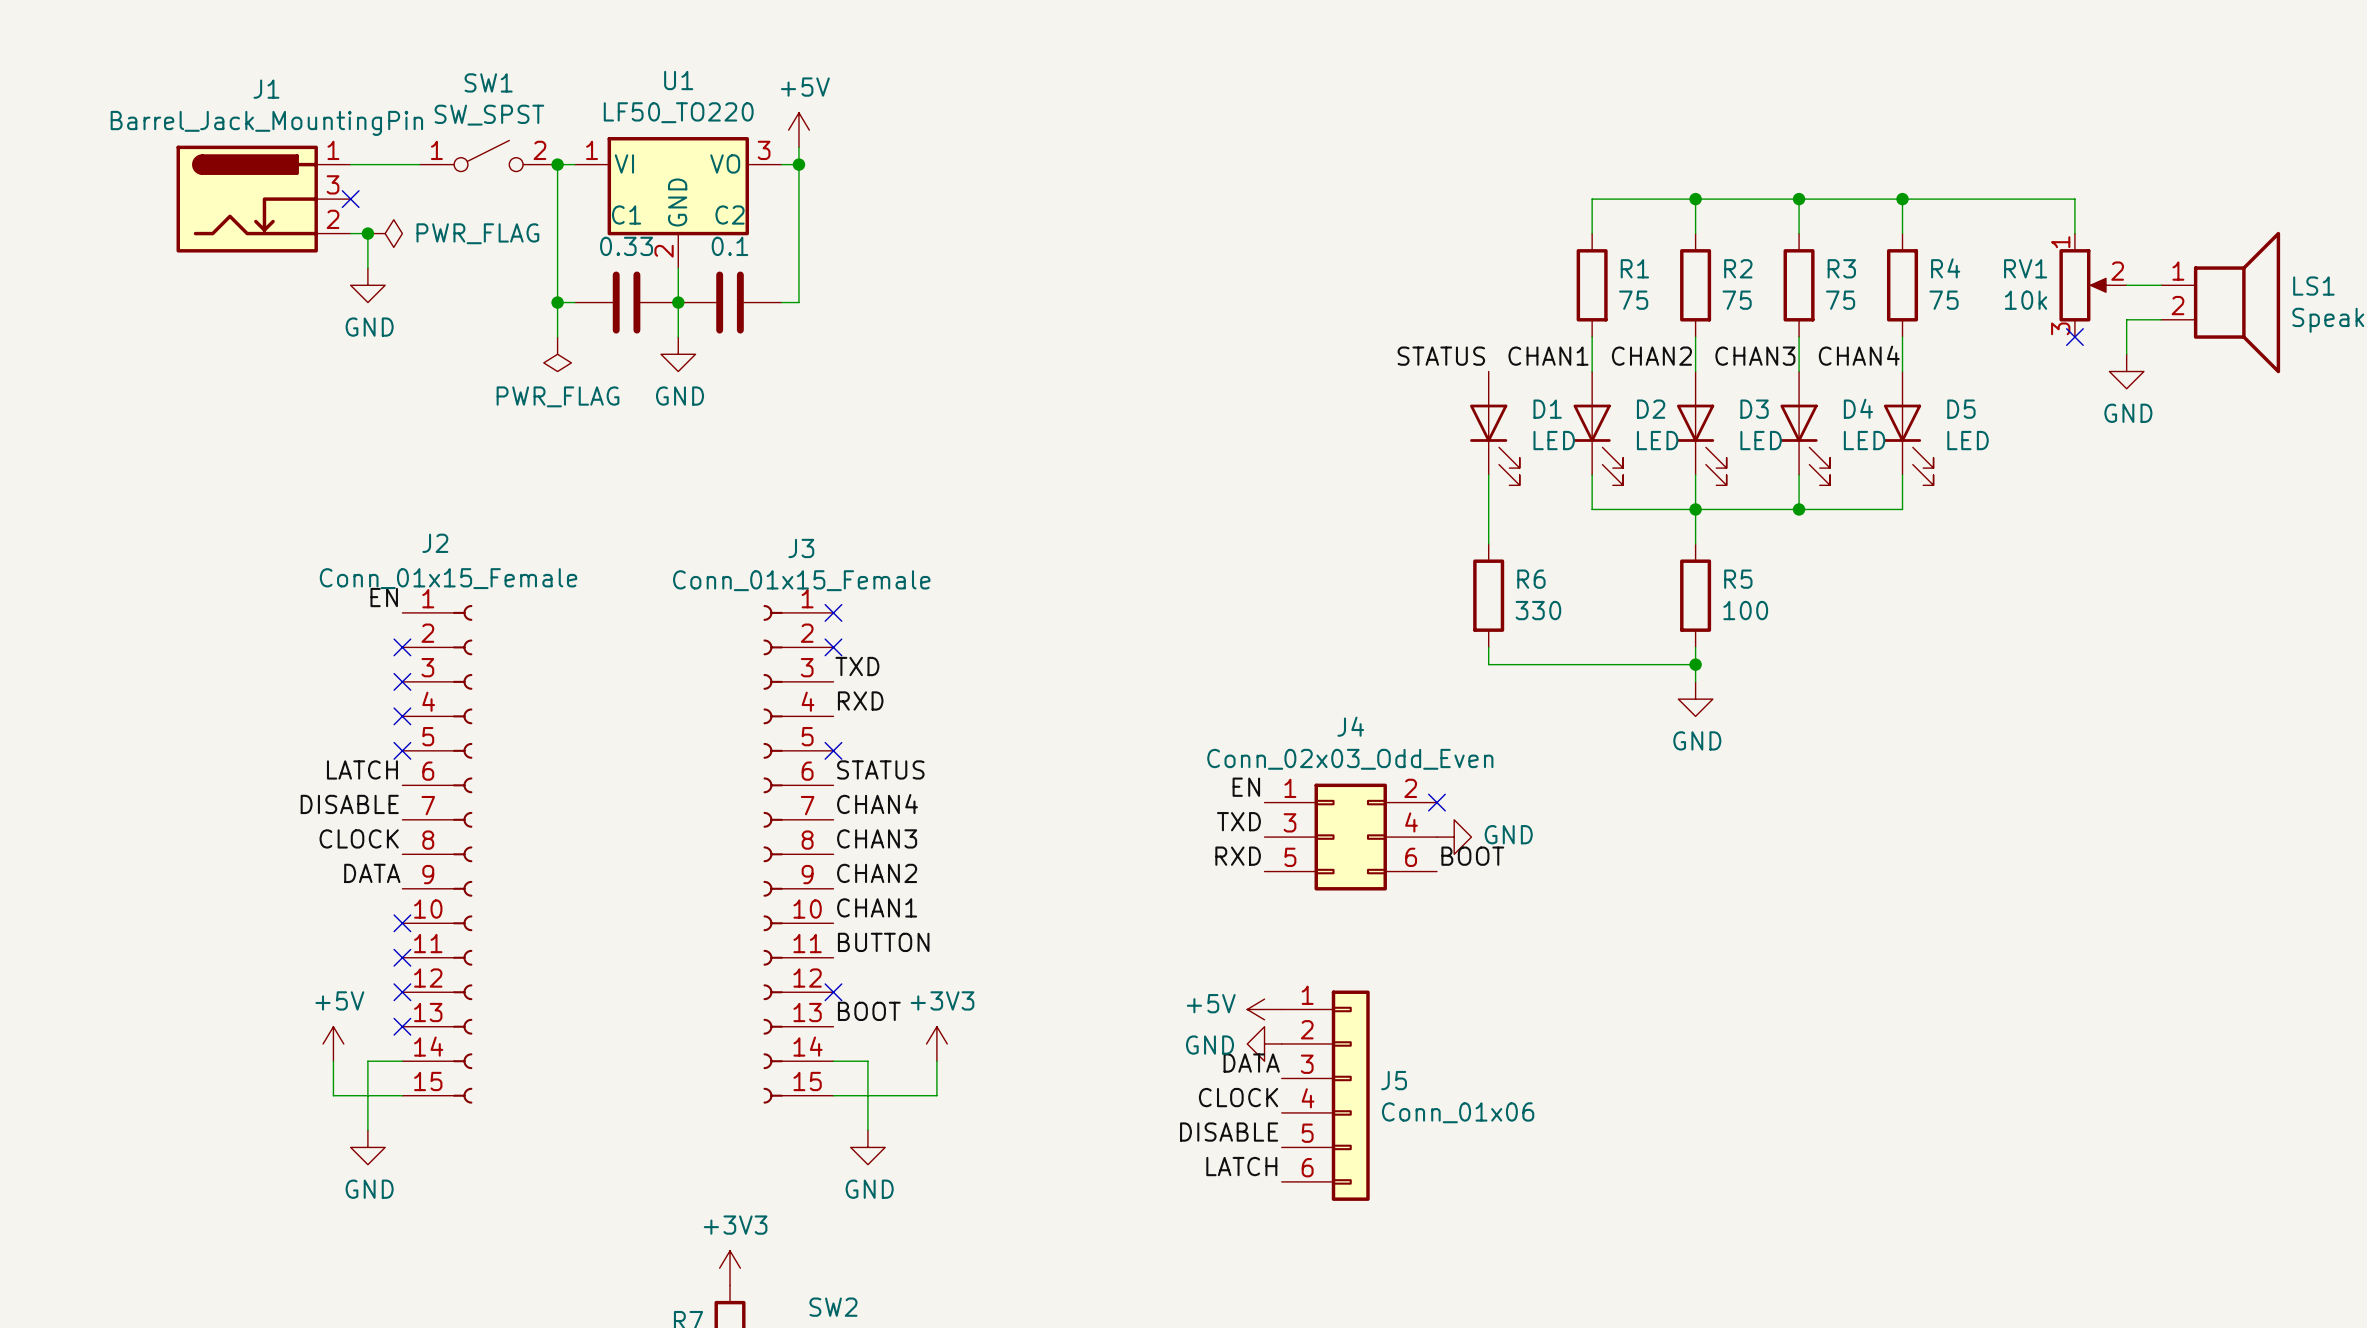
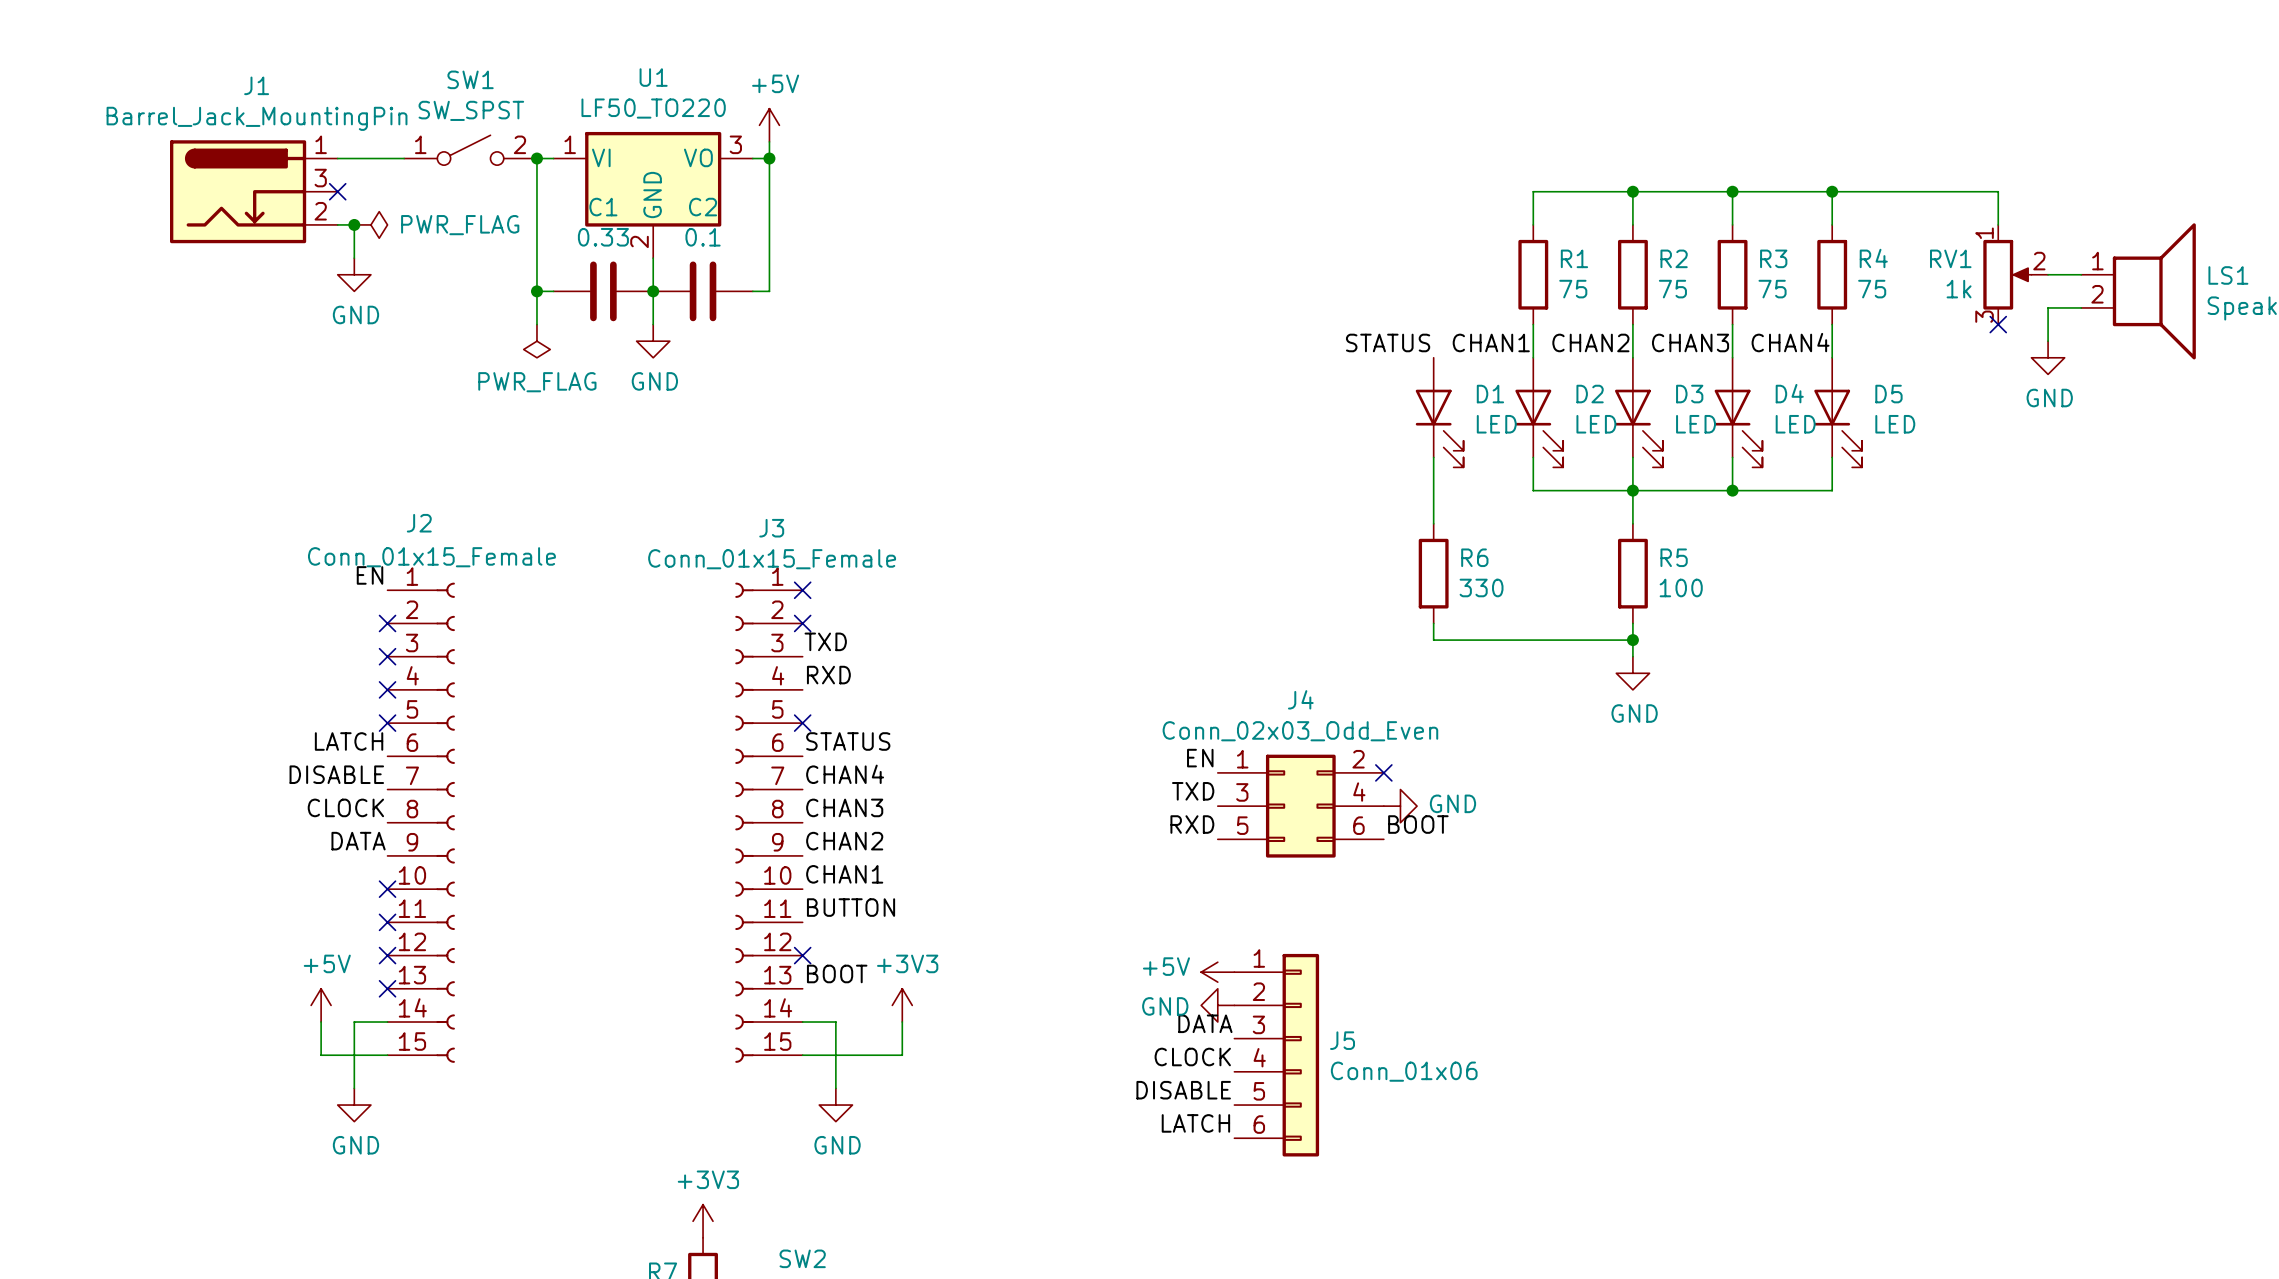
RV1 value: 10k (2026, 300) -> 1k (1959, 289)

